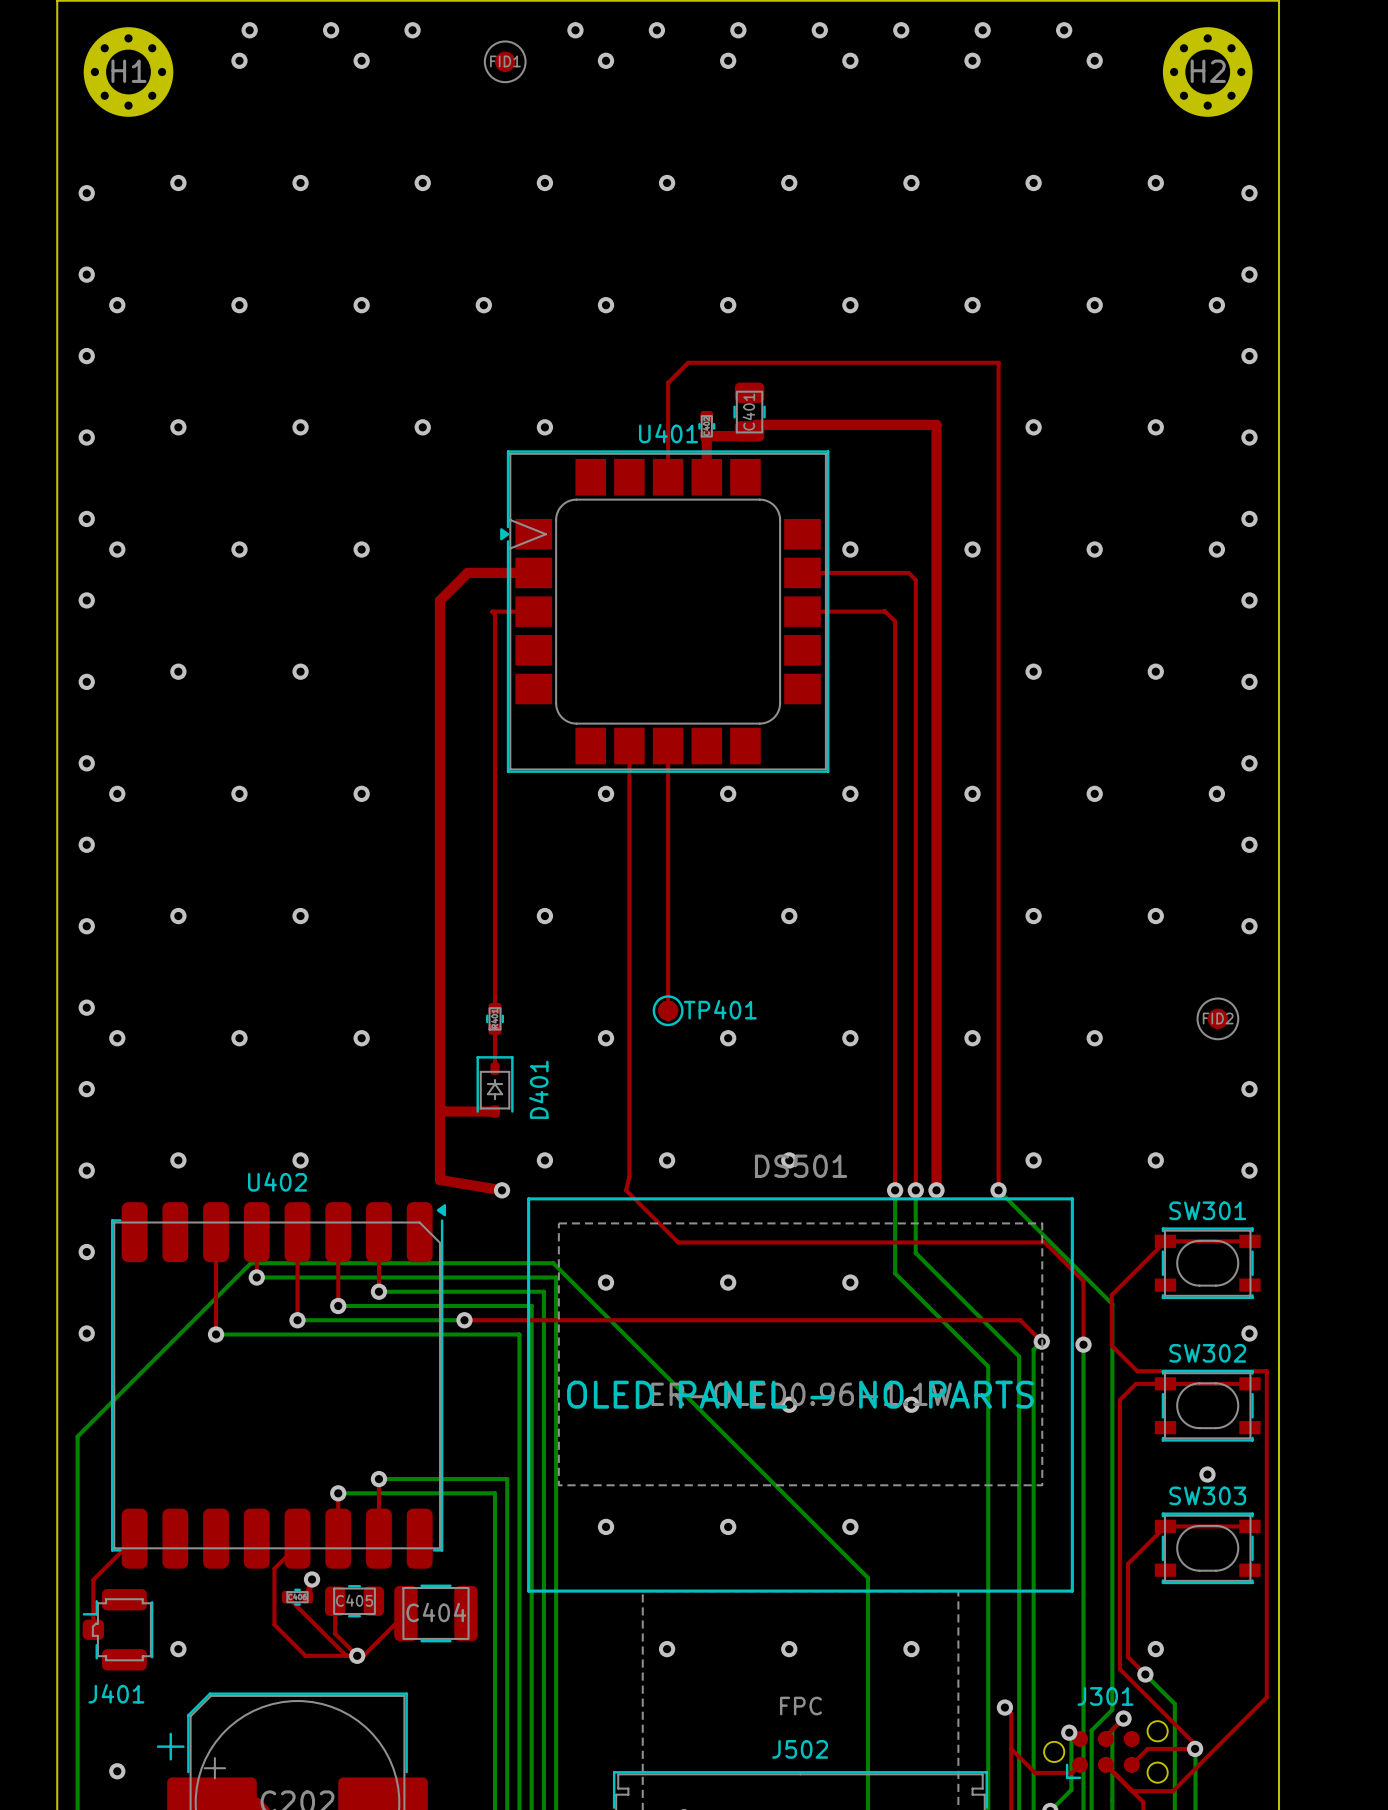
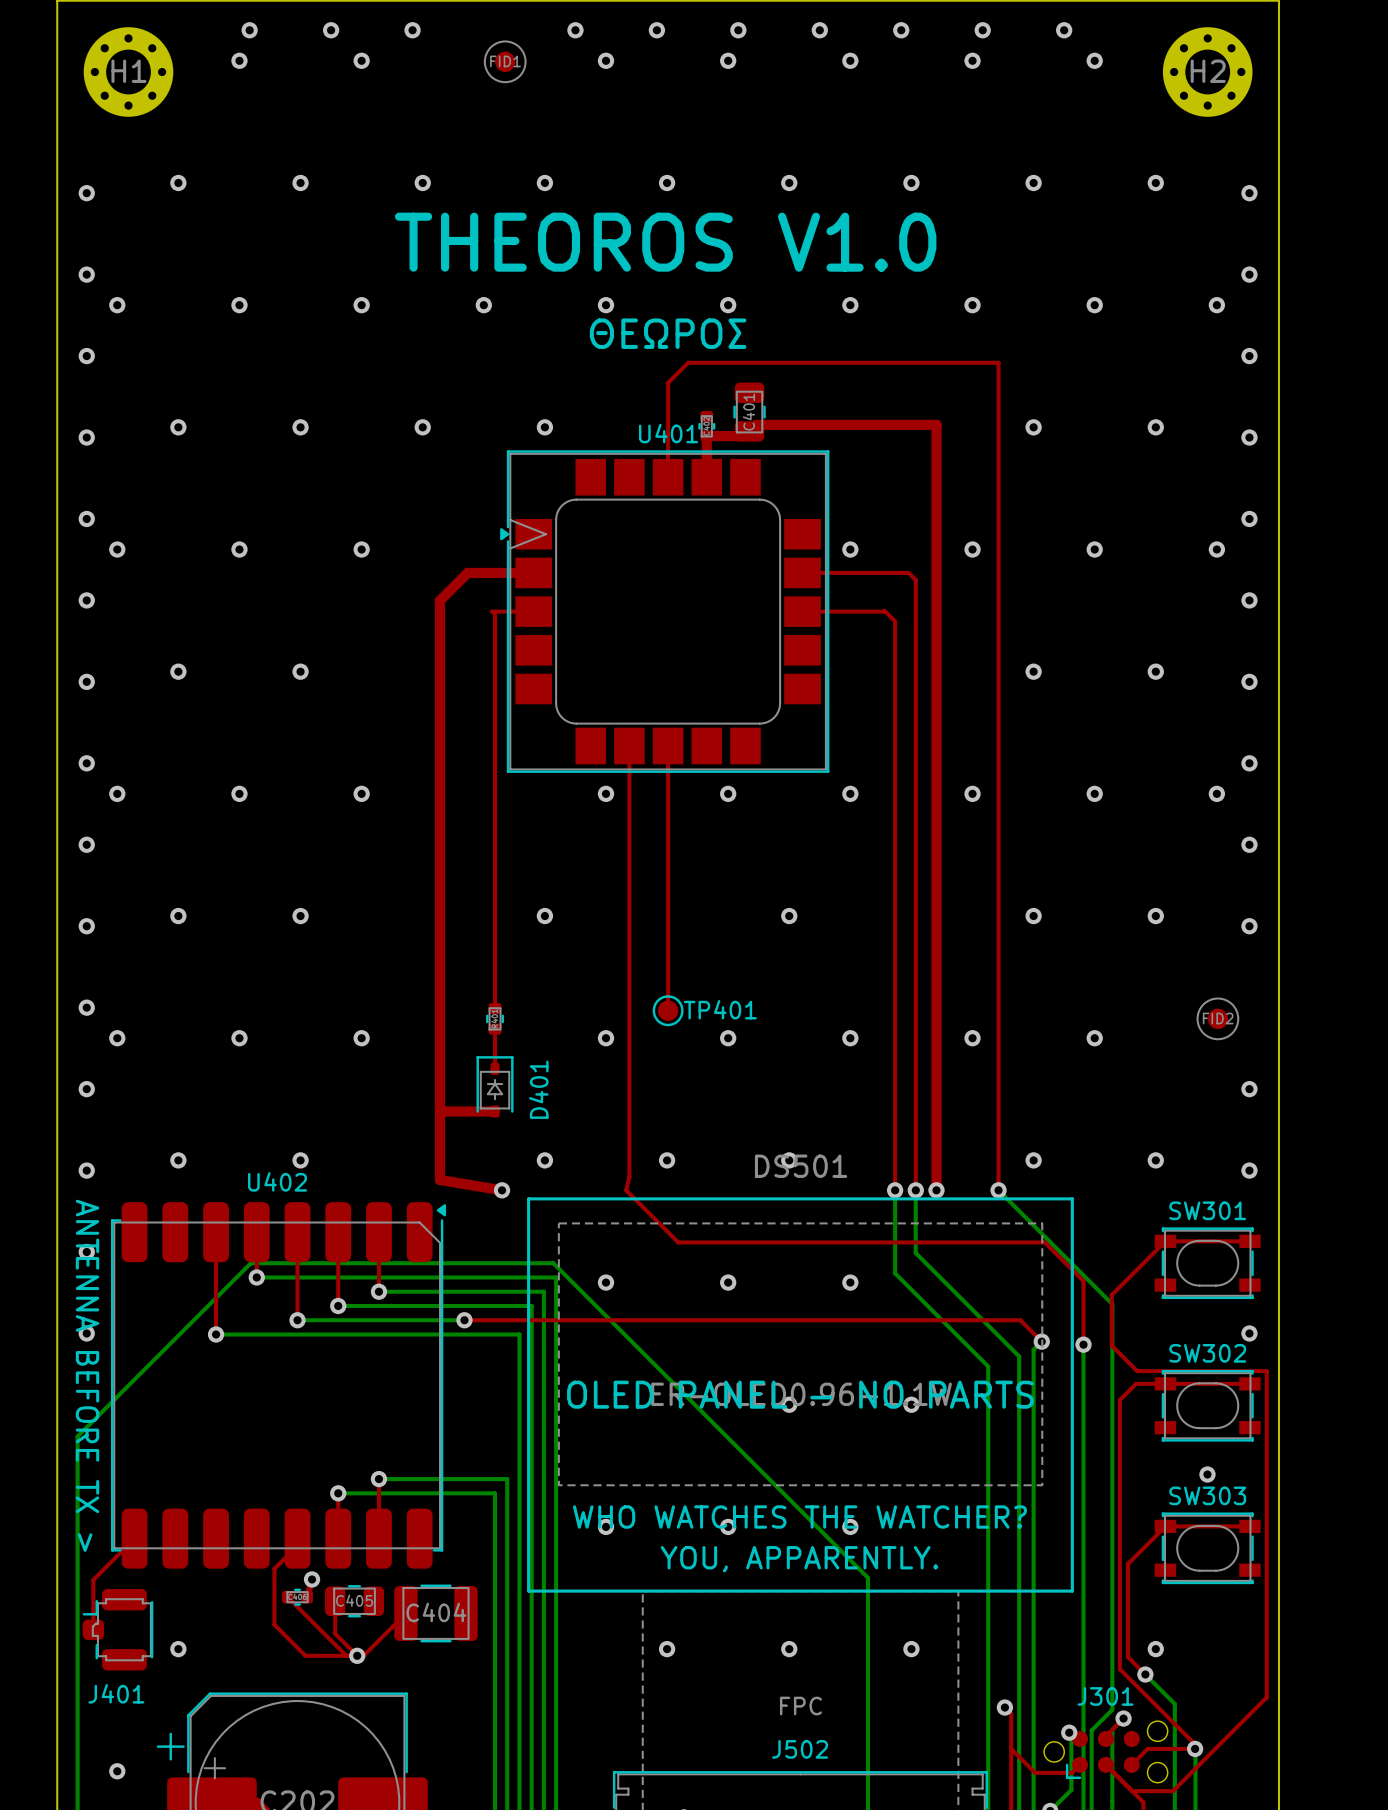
text: none -> THEOROS V1.0 (665, 242)
text: none -> ΘΕΩΡΟΣ (668, 333)
text: none -> ANTENNA BEFORE TX > (87, 1375)
text: none -> WHO WATCHES THE WATCHER? (799, 1517)
text: none -> YOU, APPARENTLY. (799, 1559)

